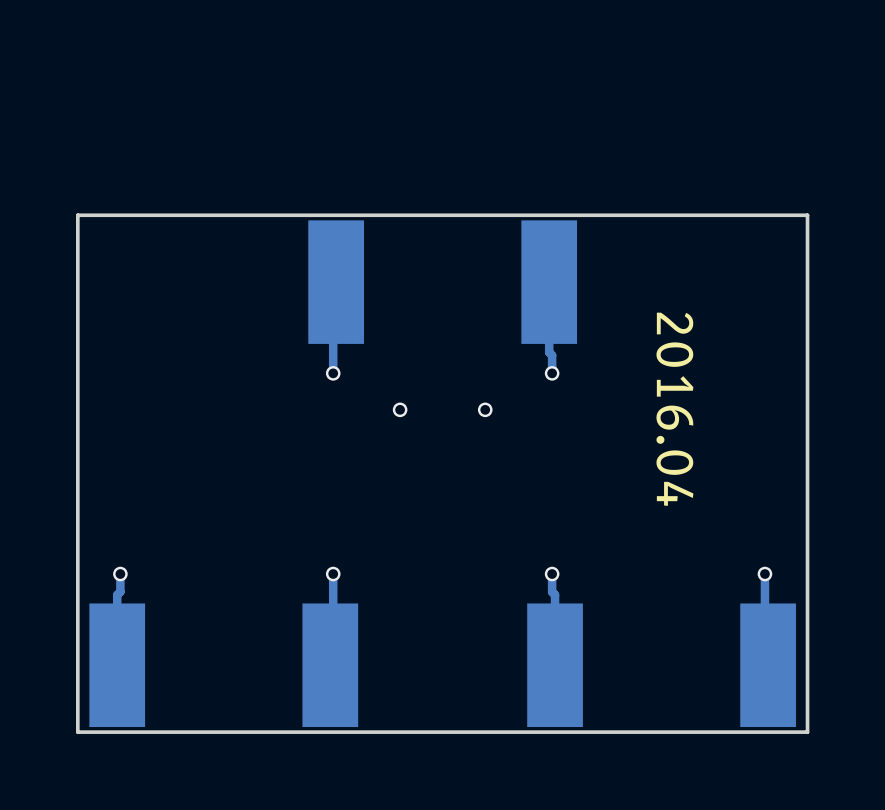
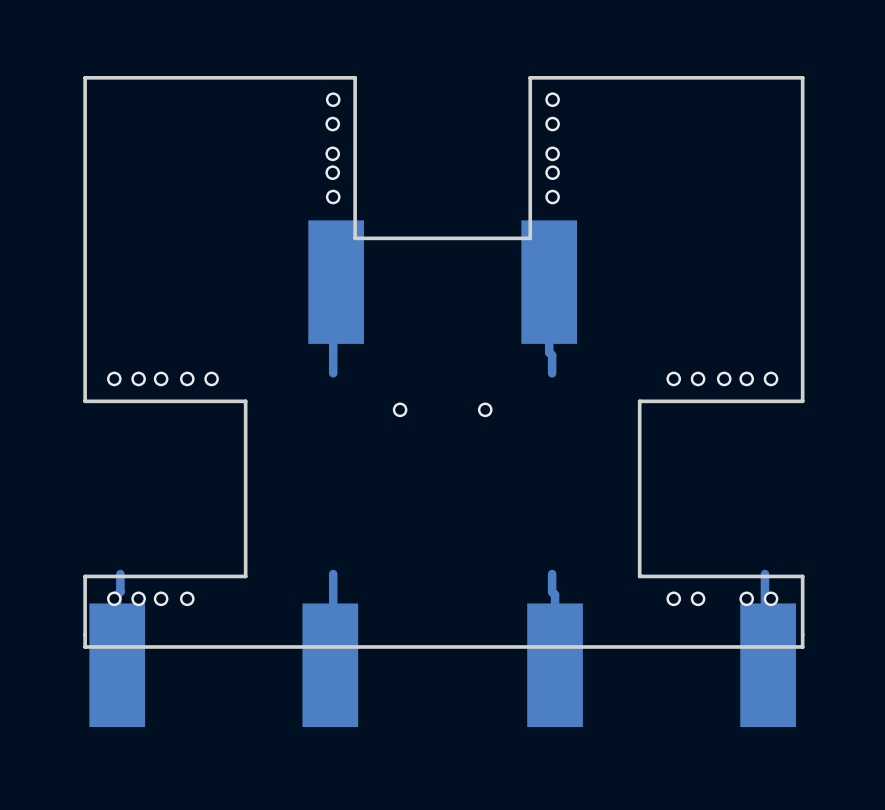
via: none -> (333, 99)
via: none -> (552, 99)
via: none -> (332, 124)
via: none -> (552, 124)
via: none -> (332, 153)
via: none -> (552, 153)
via: none -> (332, 172)
via: none -> (552, 172)
via: none -> (333, 197)
via: none -> (552, 197)
board edge: (807, 215) (77, 215) (77, 732) (807, 732) (807, 215) -> (802, 77) (802, 401) (639, 401) (639, 576) (802, 576) (802, 646) (85, 646) (85, 576) (245, 576) (245, 401) (85, 401) (85, 77) (355, 77) (355, 238) (530, 238) (530, 77) (802, 77)
via: (333, 373) -> none
via: (552, 373) -> none
via: none -> (114, 378)
via: none -> (138, 378)
via: none -> (161, 378)
via: none -> (187, 378)
via: none -> (211, 378)
via: none -> (673, 378)
via: none -> (698, 378)
via: none -> (724, 378)
via: none -> (746, 378)
via: none -> (771, 378)
text: 2016.04 (674, 409) -> none
via: (120, 574) -> none
via: (333, 574) -> none
via: (552, 574) -> none
via: (764, 574) -> none
via: none -> (114, 598)
via: none -> (138, 598)
via: none -> (161, 598)
via: none -> (187, 598)
via: none -> (673, 598)
via: none -> (698, 598)
via: none -> (746, 598)
via: none -> (771, 598)

